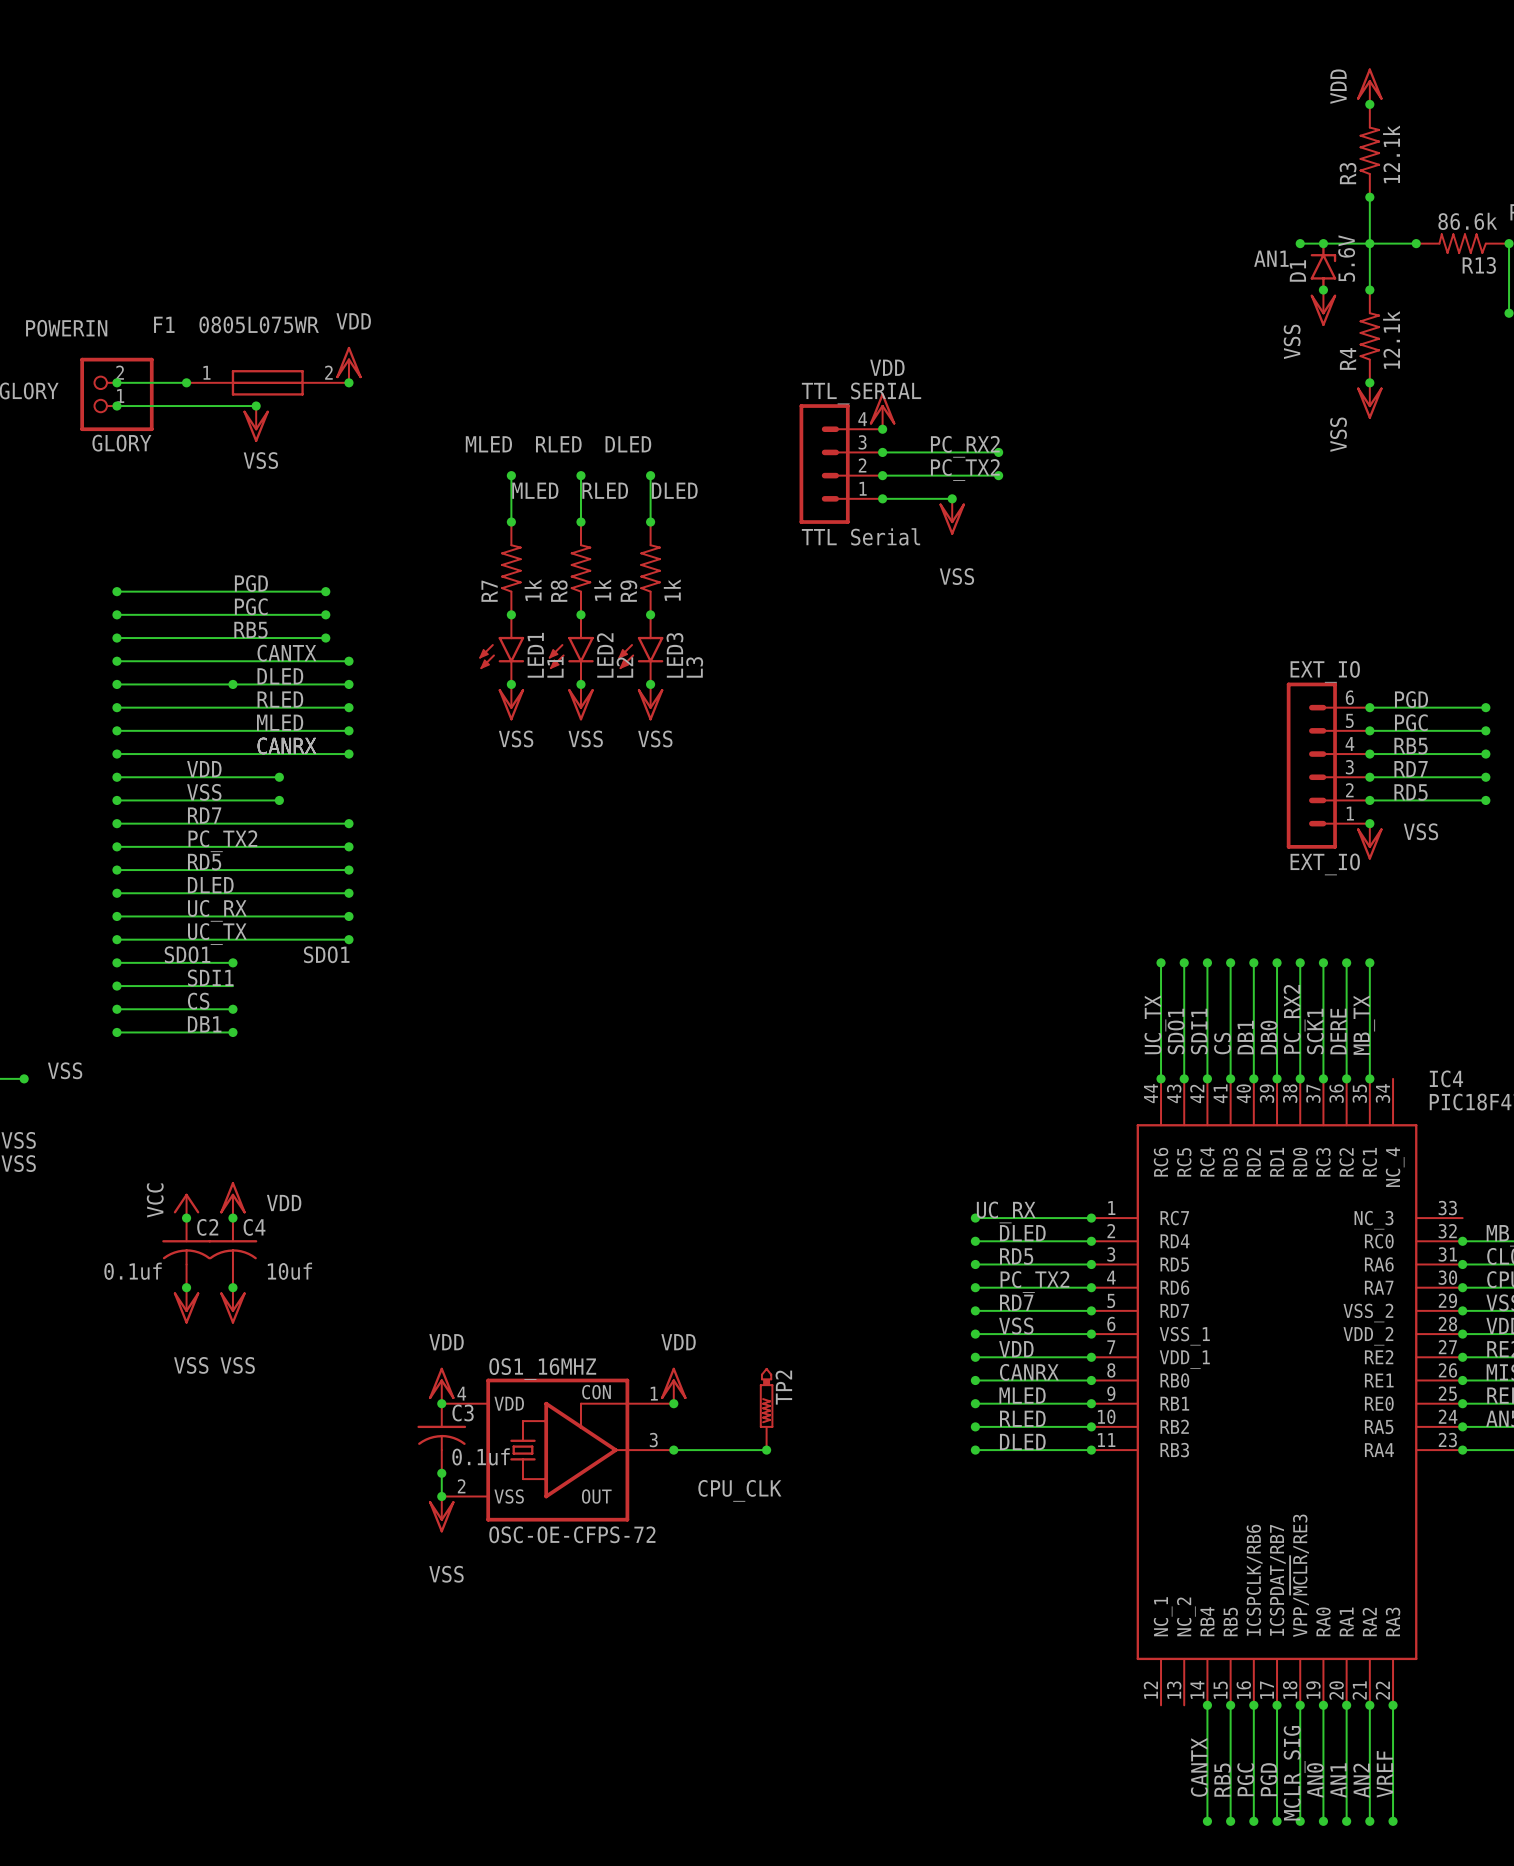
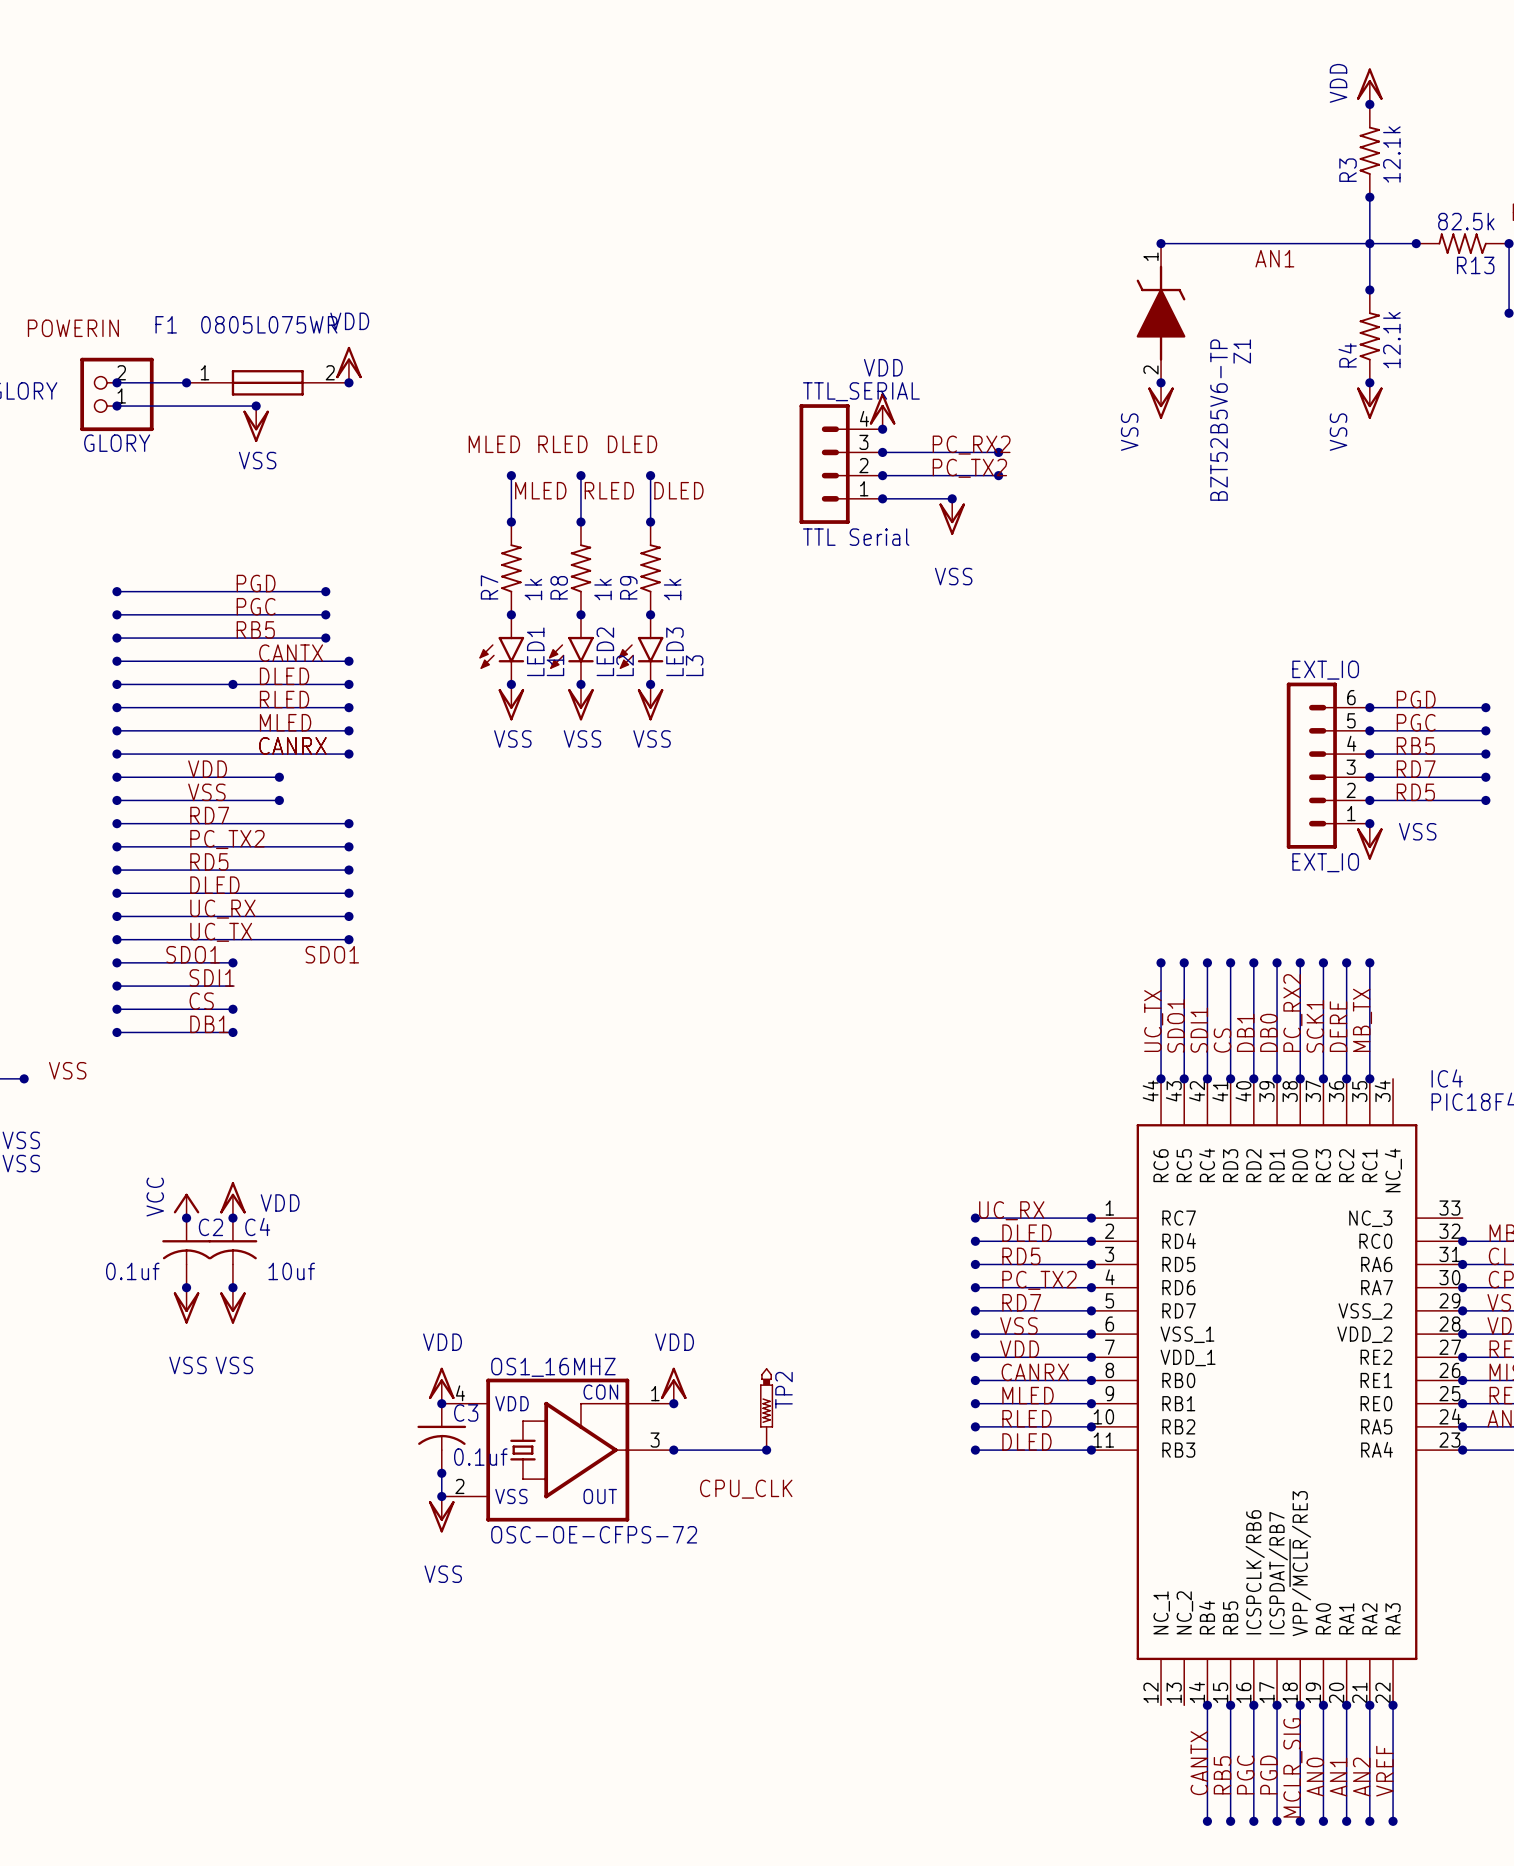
R13 value: 86.6k (1467, 221) -> 82.5k (1466, 221)
wire: none -> (1161, 243) (1300, 243)
junction: none -> (1161, 243)
junction: (1300, 243) -> none
junction: (1323, 243) -> none
D1: 5.6V (1323, 266) -> none
junction: (1323, 290) -> none
power symbol position: VSS (1323, 308) -> VSS (1161, 400)
Z1: none -> BZT52B5V6-TP (1161, 313)
junction: none -> (1161, 382)

